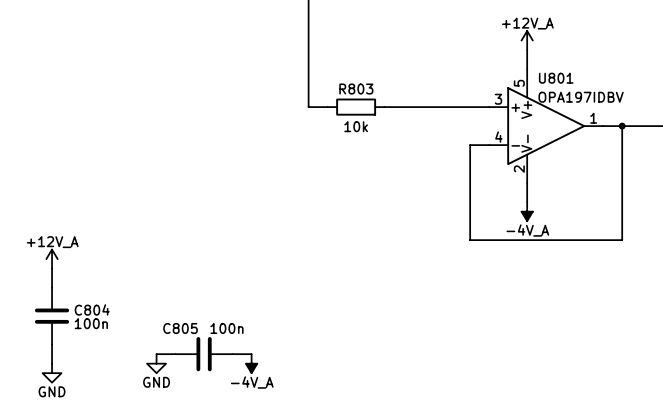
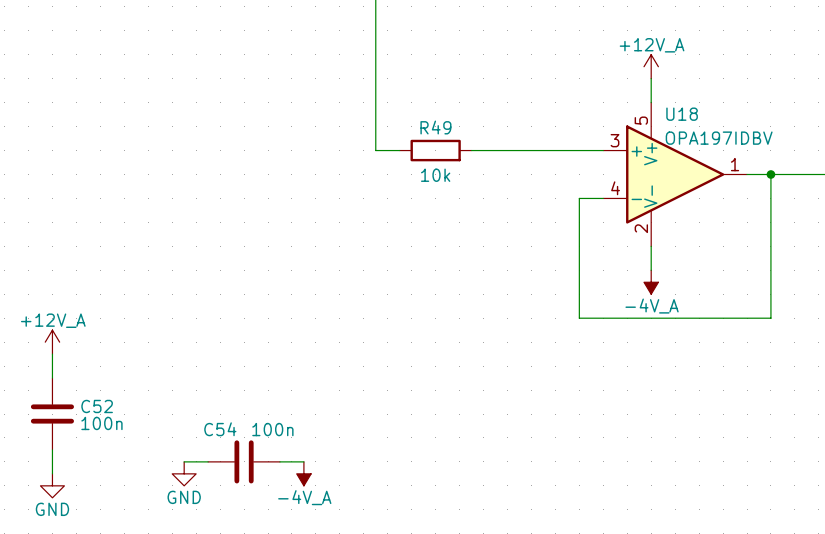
U801 name: U801 (556, 78) -> U18 (682, 114)
R803 name: R803 (356, 89) -> R49 (435, 127)
C804 name: C804 (92, 309) -> C52 (97, 406)
C805 name: C805 (180, 328) -> C54 (220, 429)

